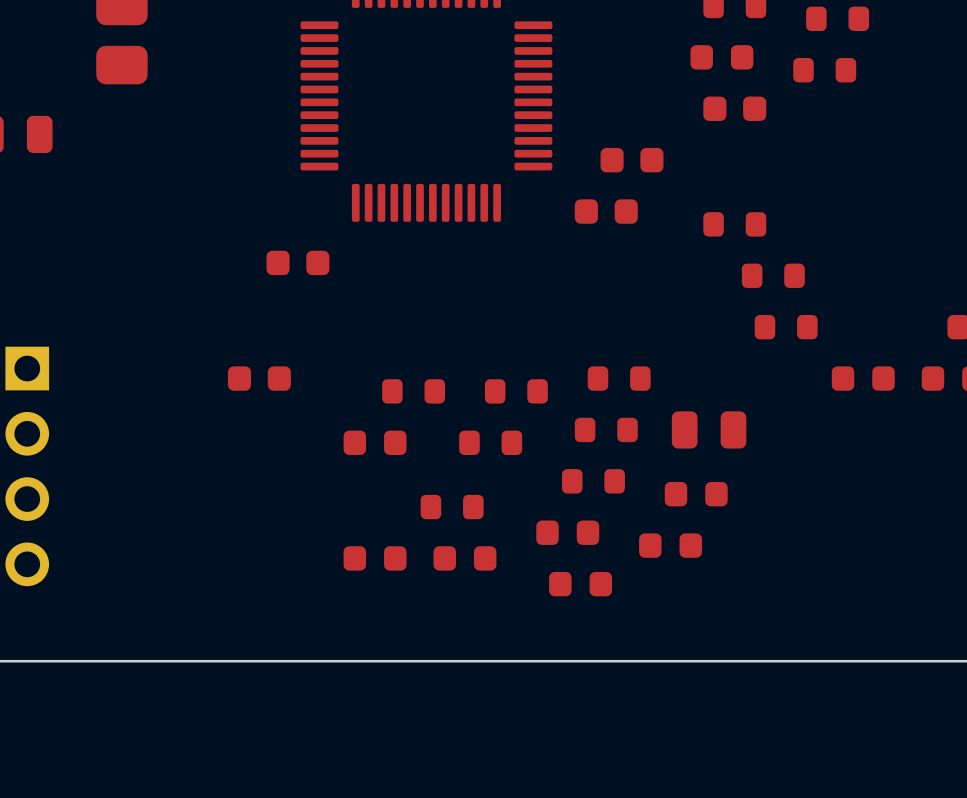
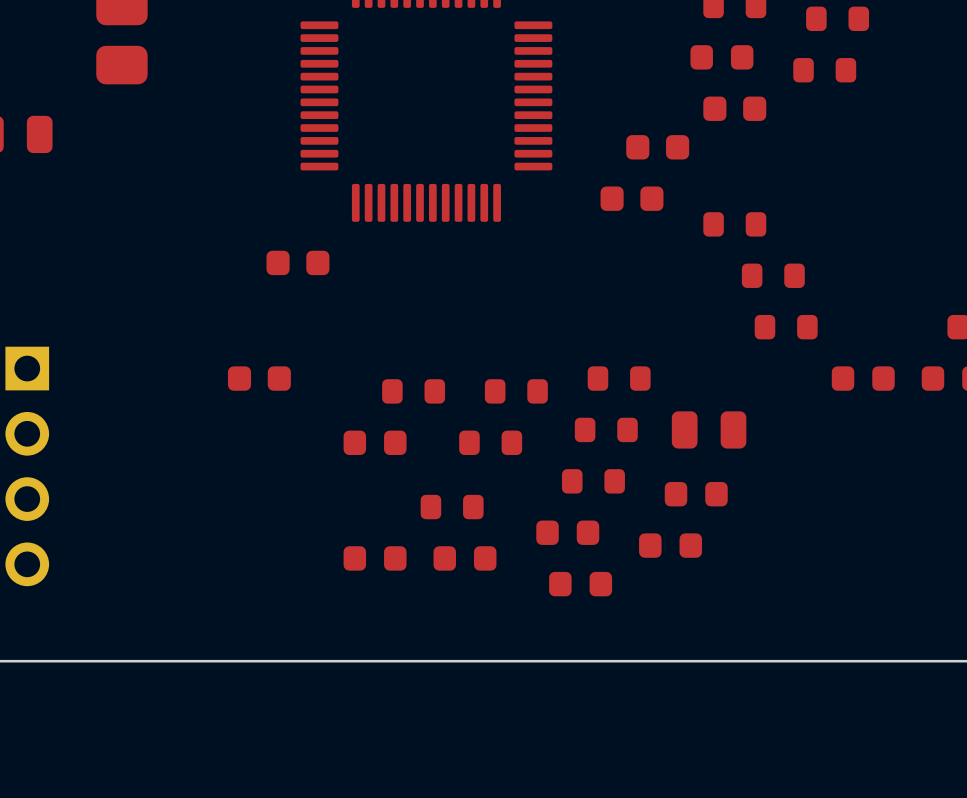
part: none -> (657, 147)
part: (632, 160) -> none
part: none -> (632, 198)
part: (606, 211) -> none

